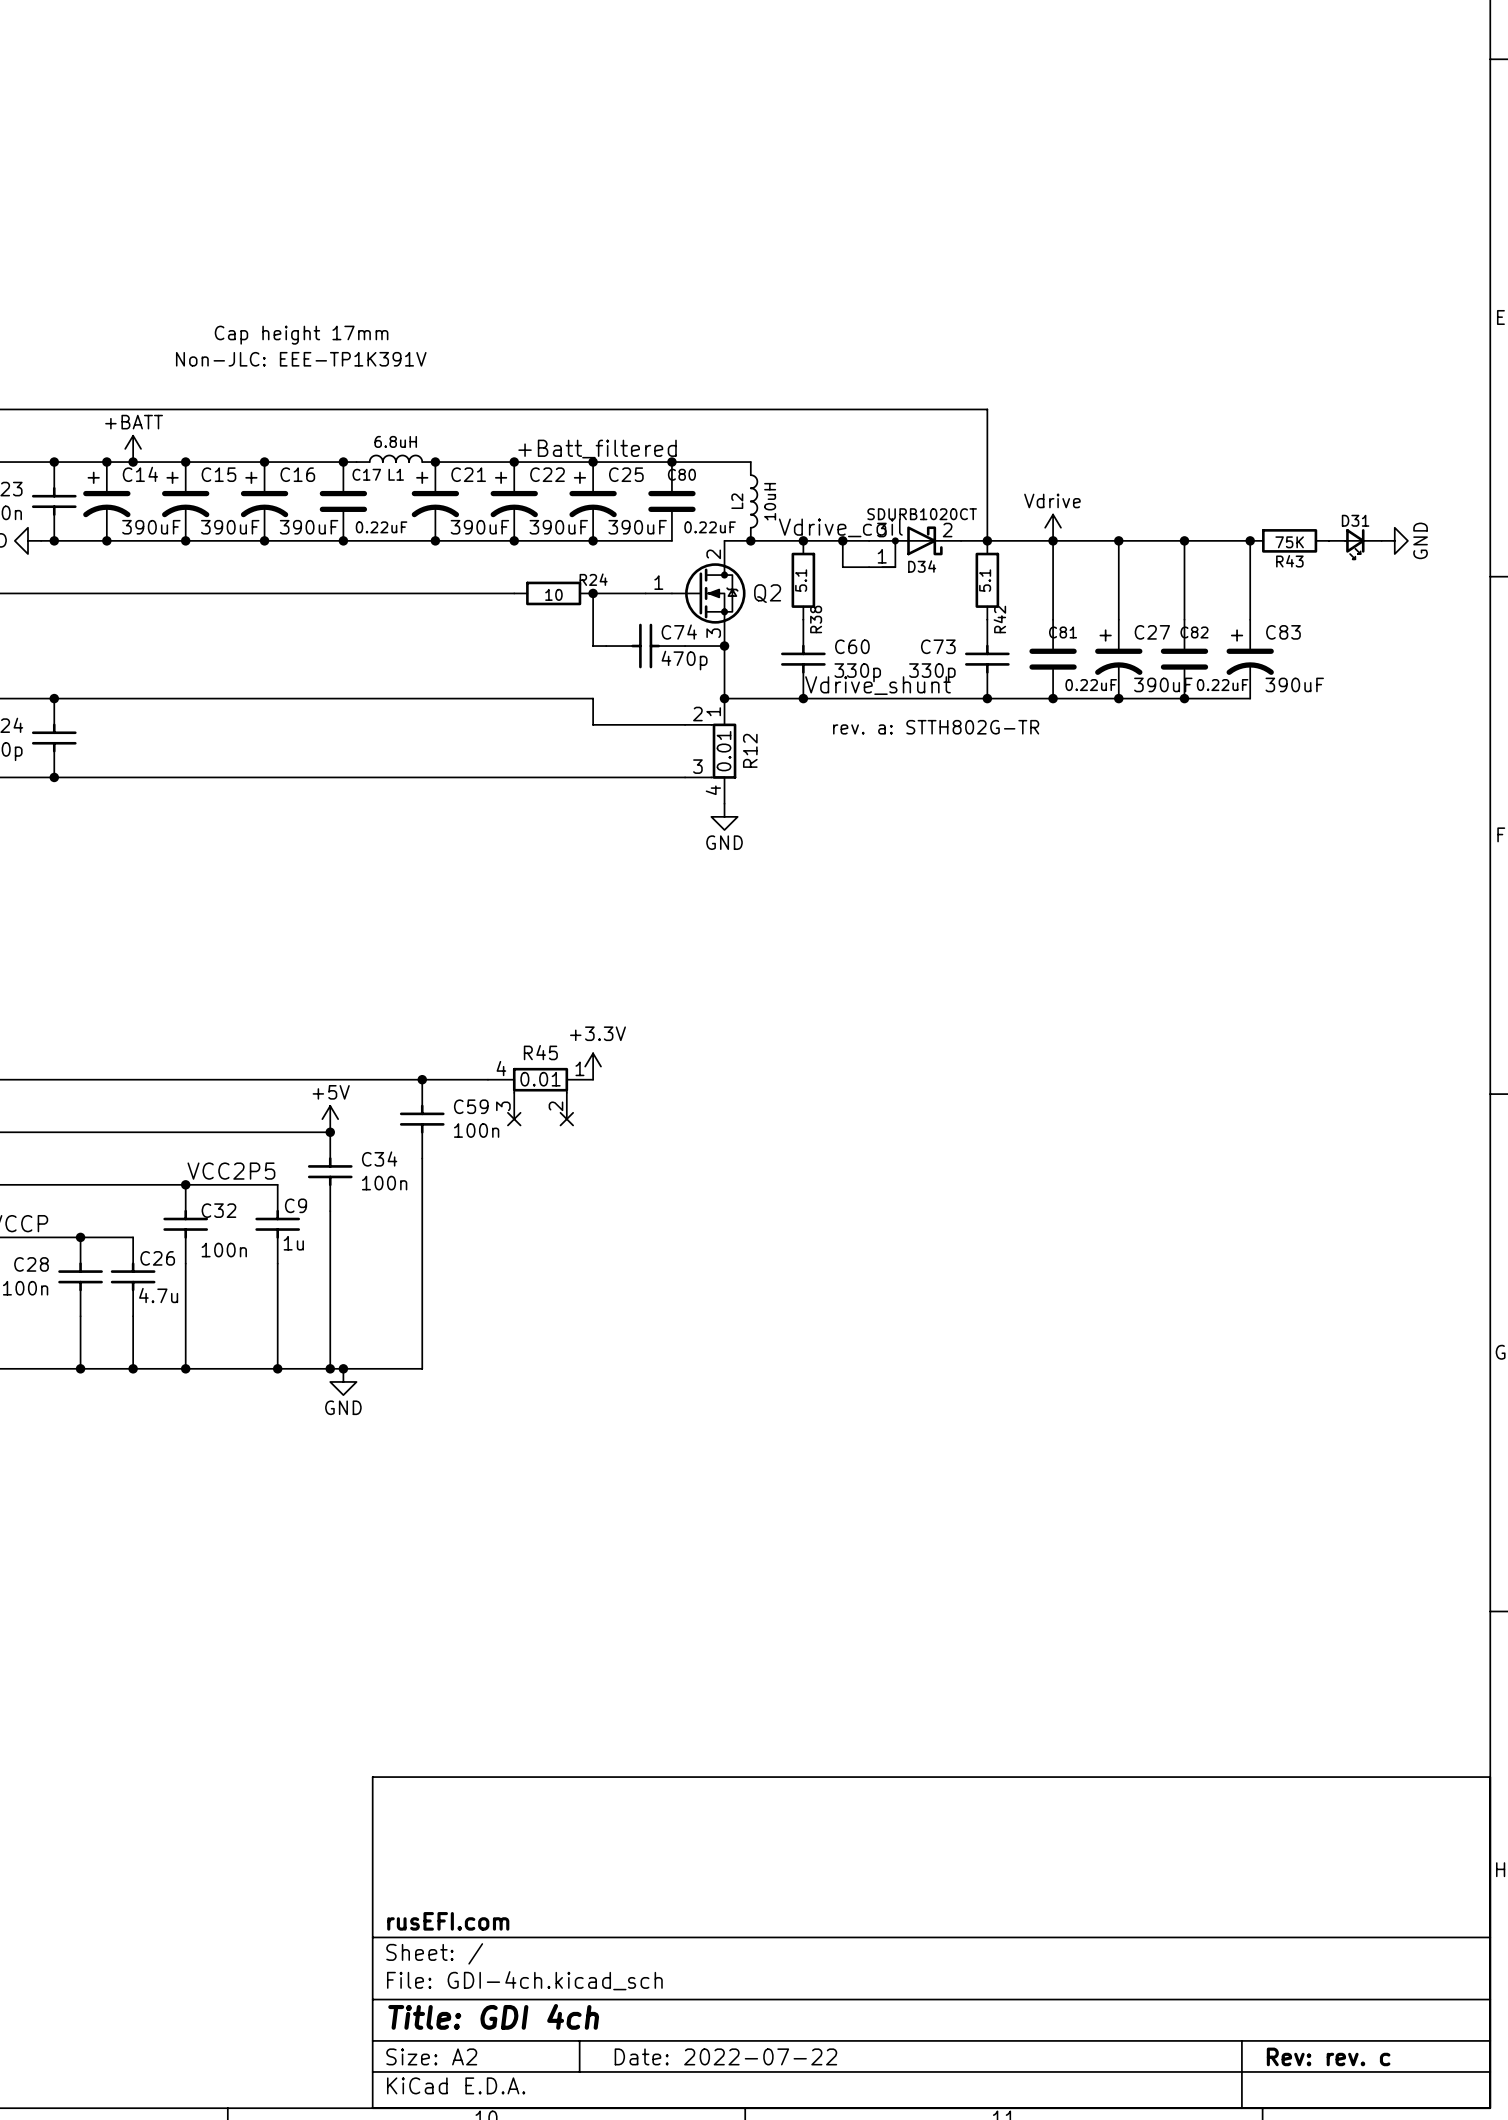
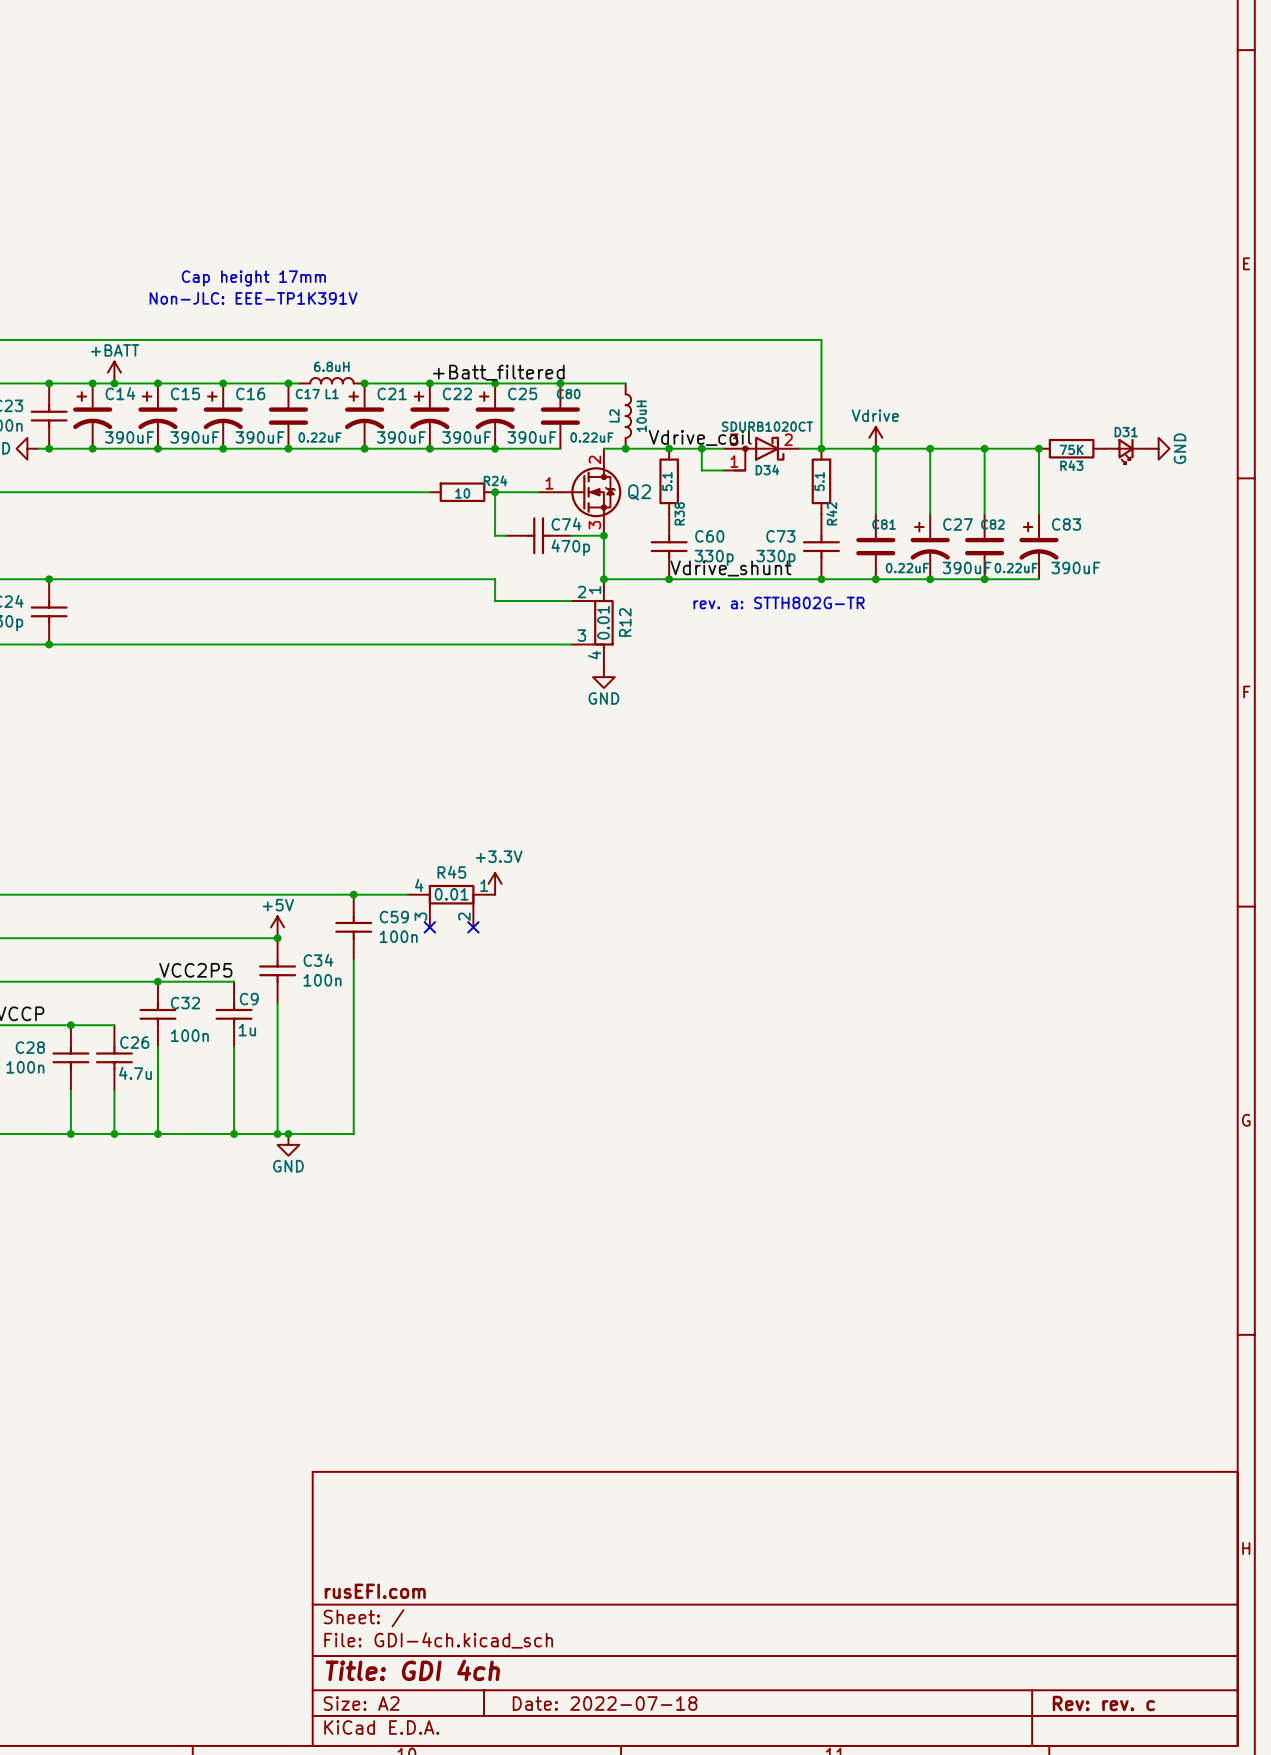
title block: Date: 2022-07-22 (725, 2056) -> Date: 2022-07-18 (605, 1703)

